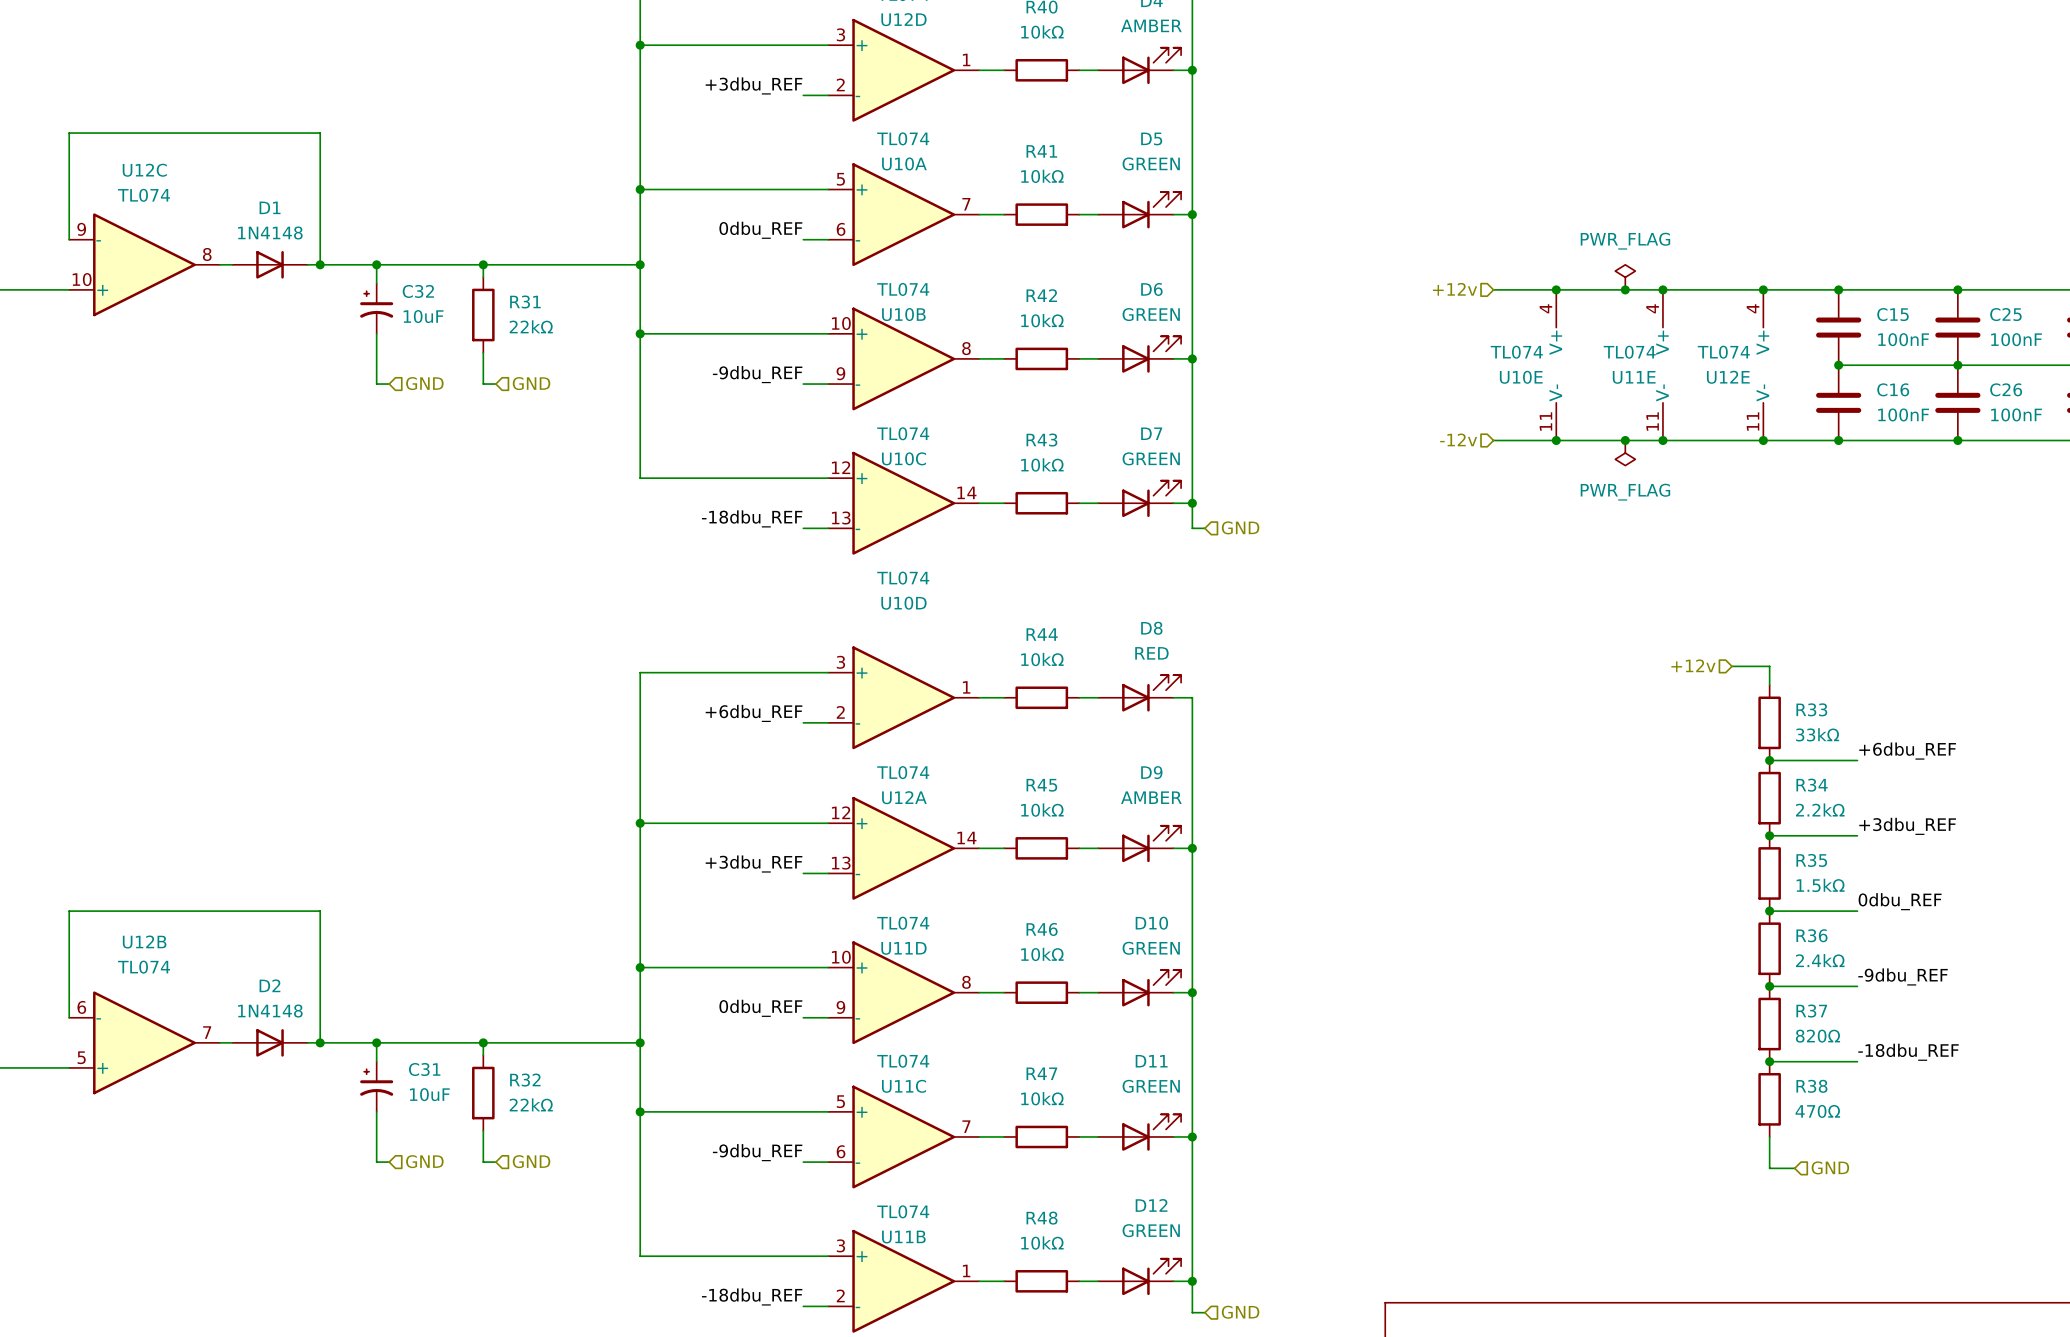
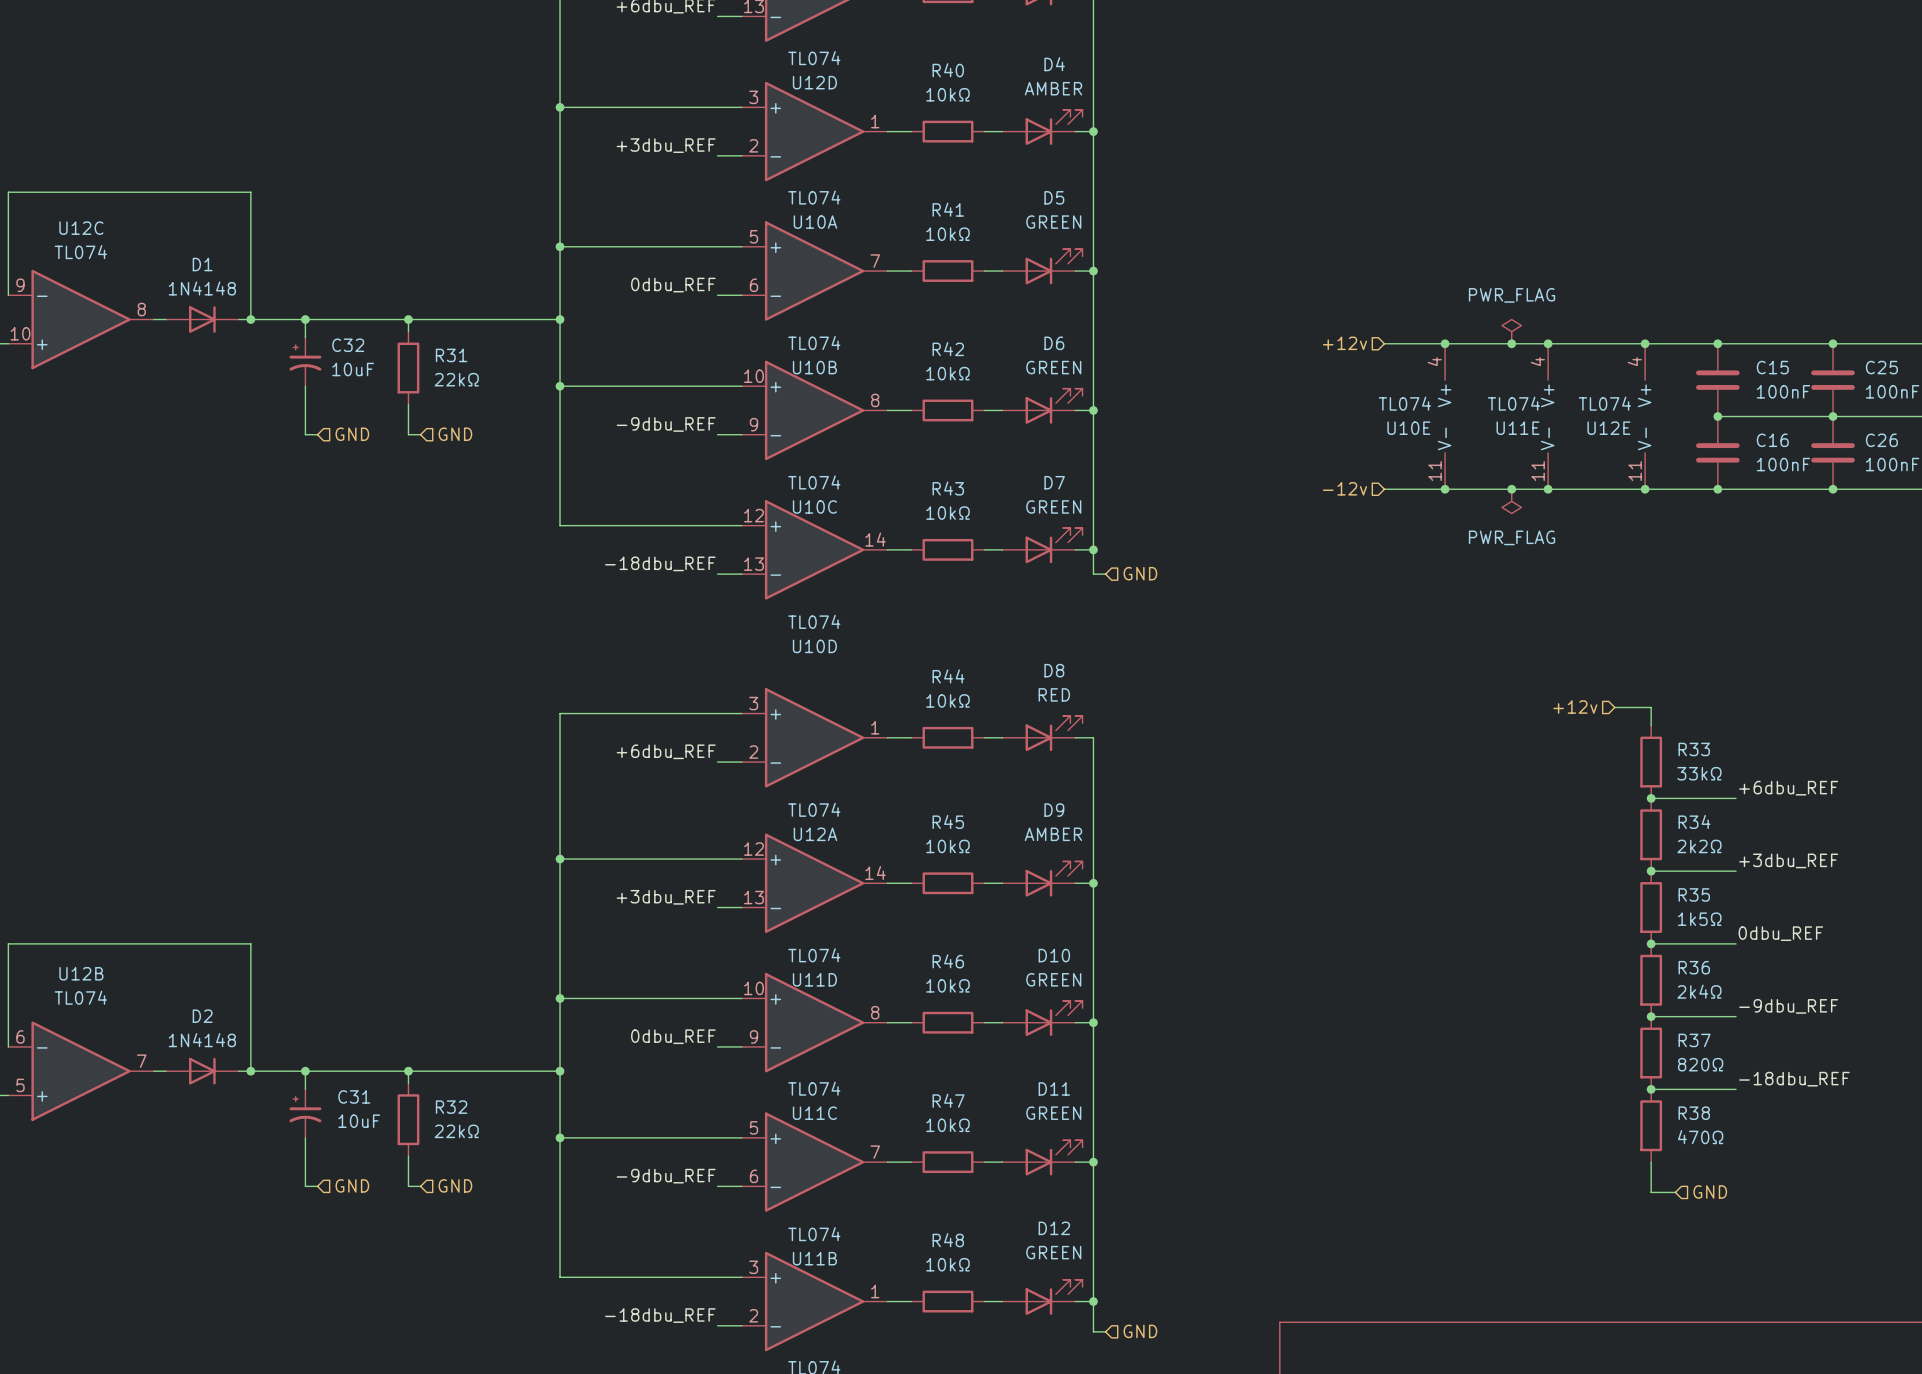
R34 value: 2.2kΩ (1820, 809) -> 2k2Ω (1699, 846)
R35 value: 1.5kΩ (1820, 885) -> 1k5Ω (1699, 919)
R36 value: 2.4kΩ (1820, 960) -> 2k4Ω (1699, 991)

